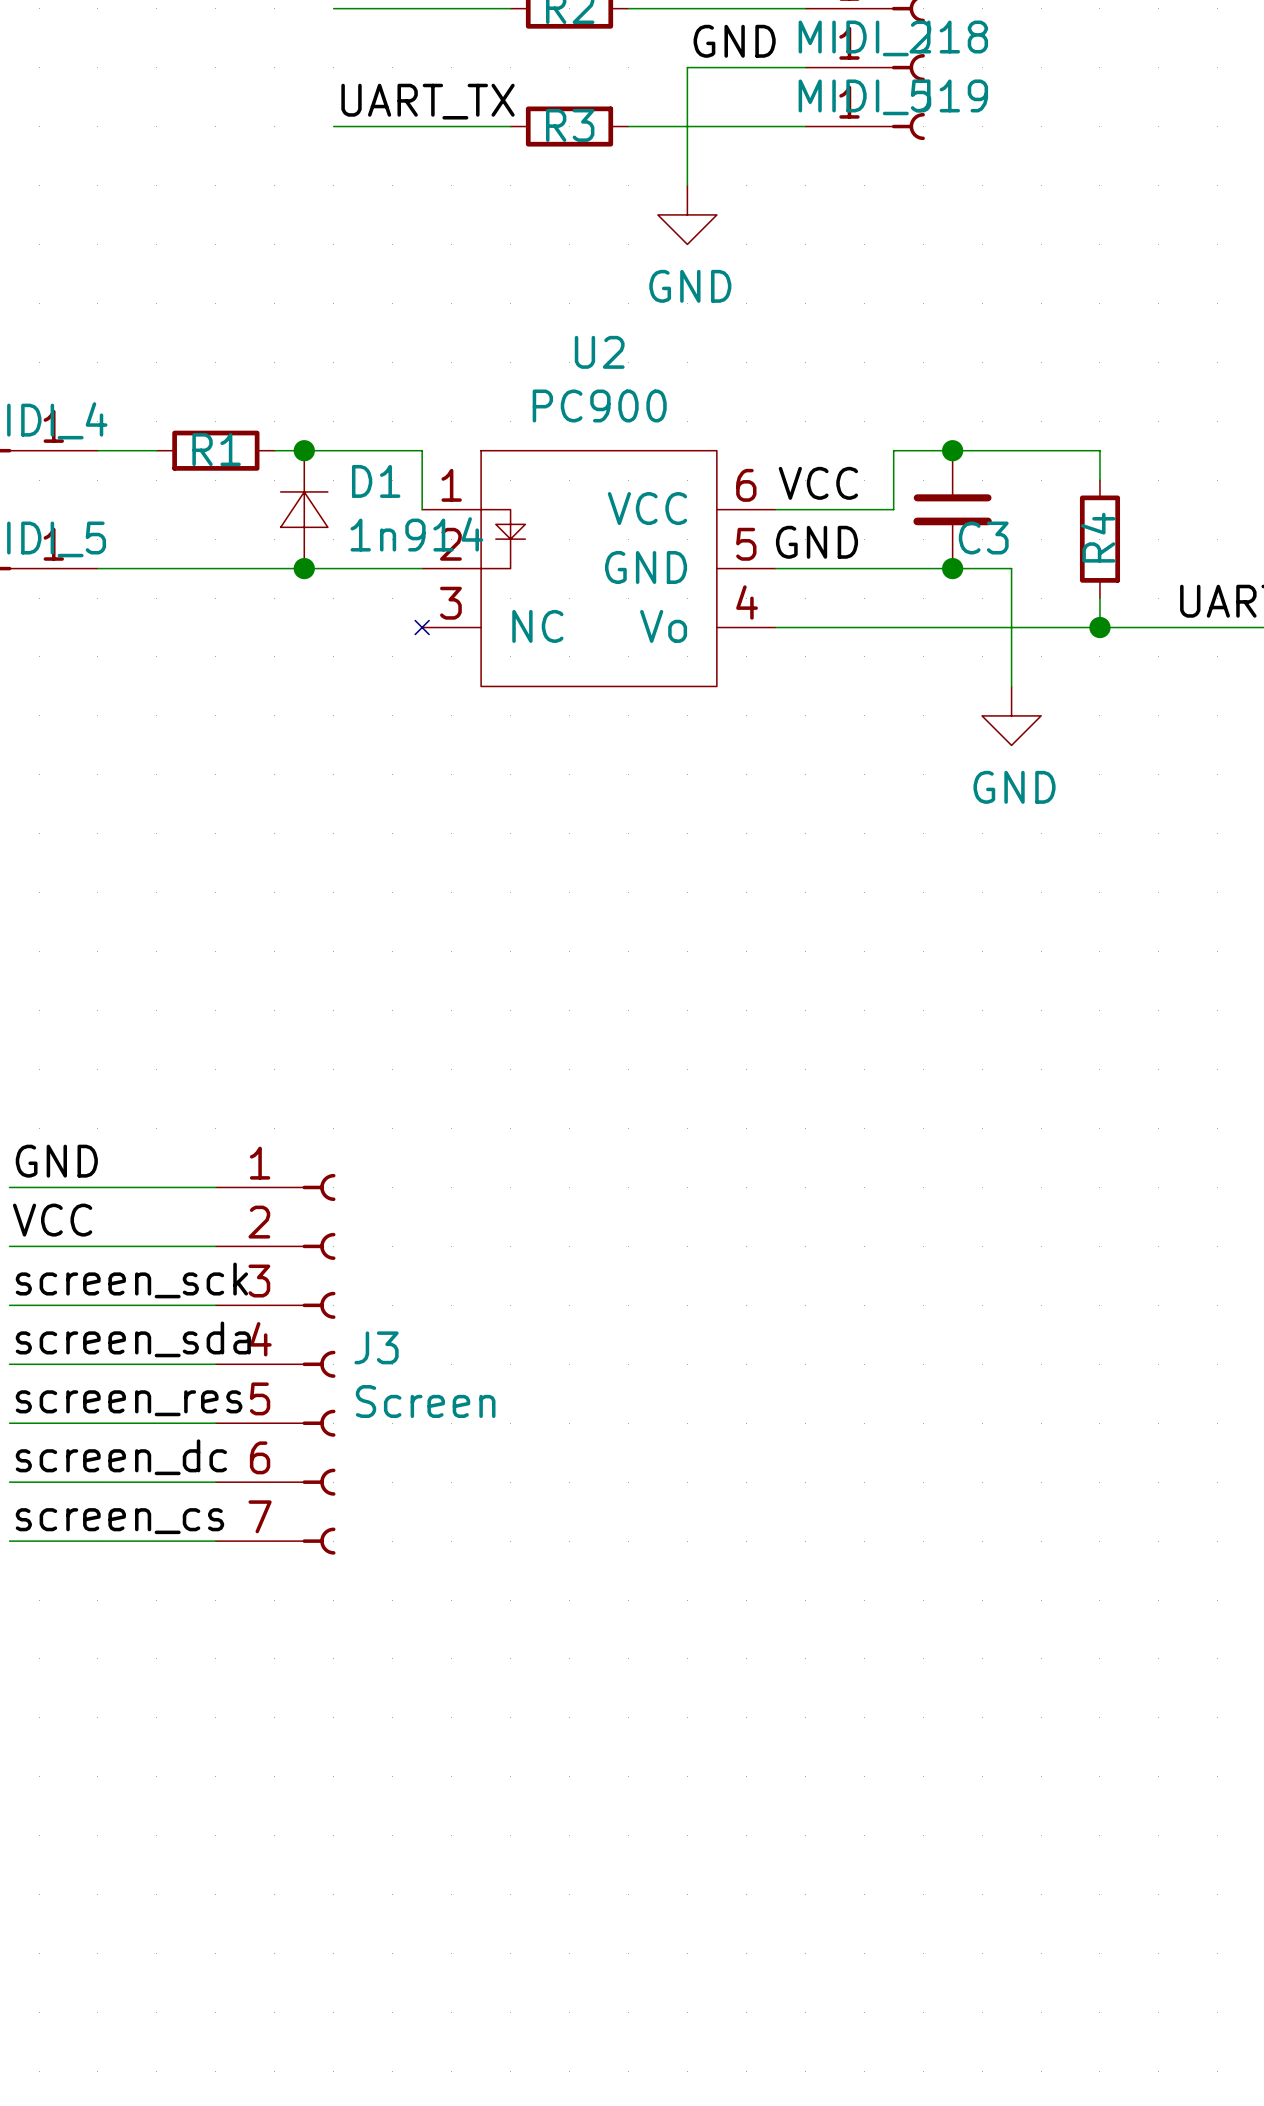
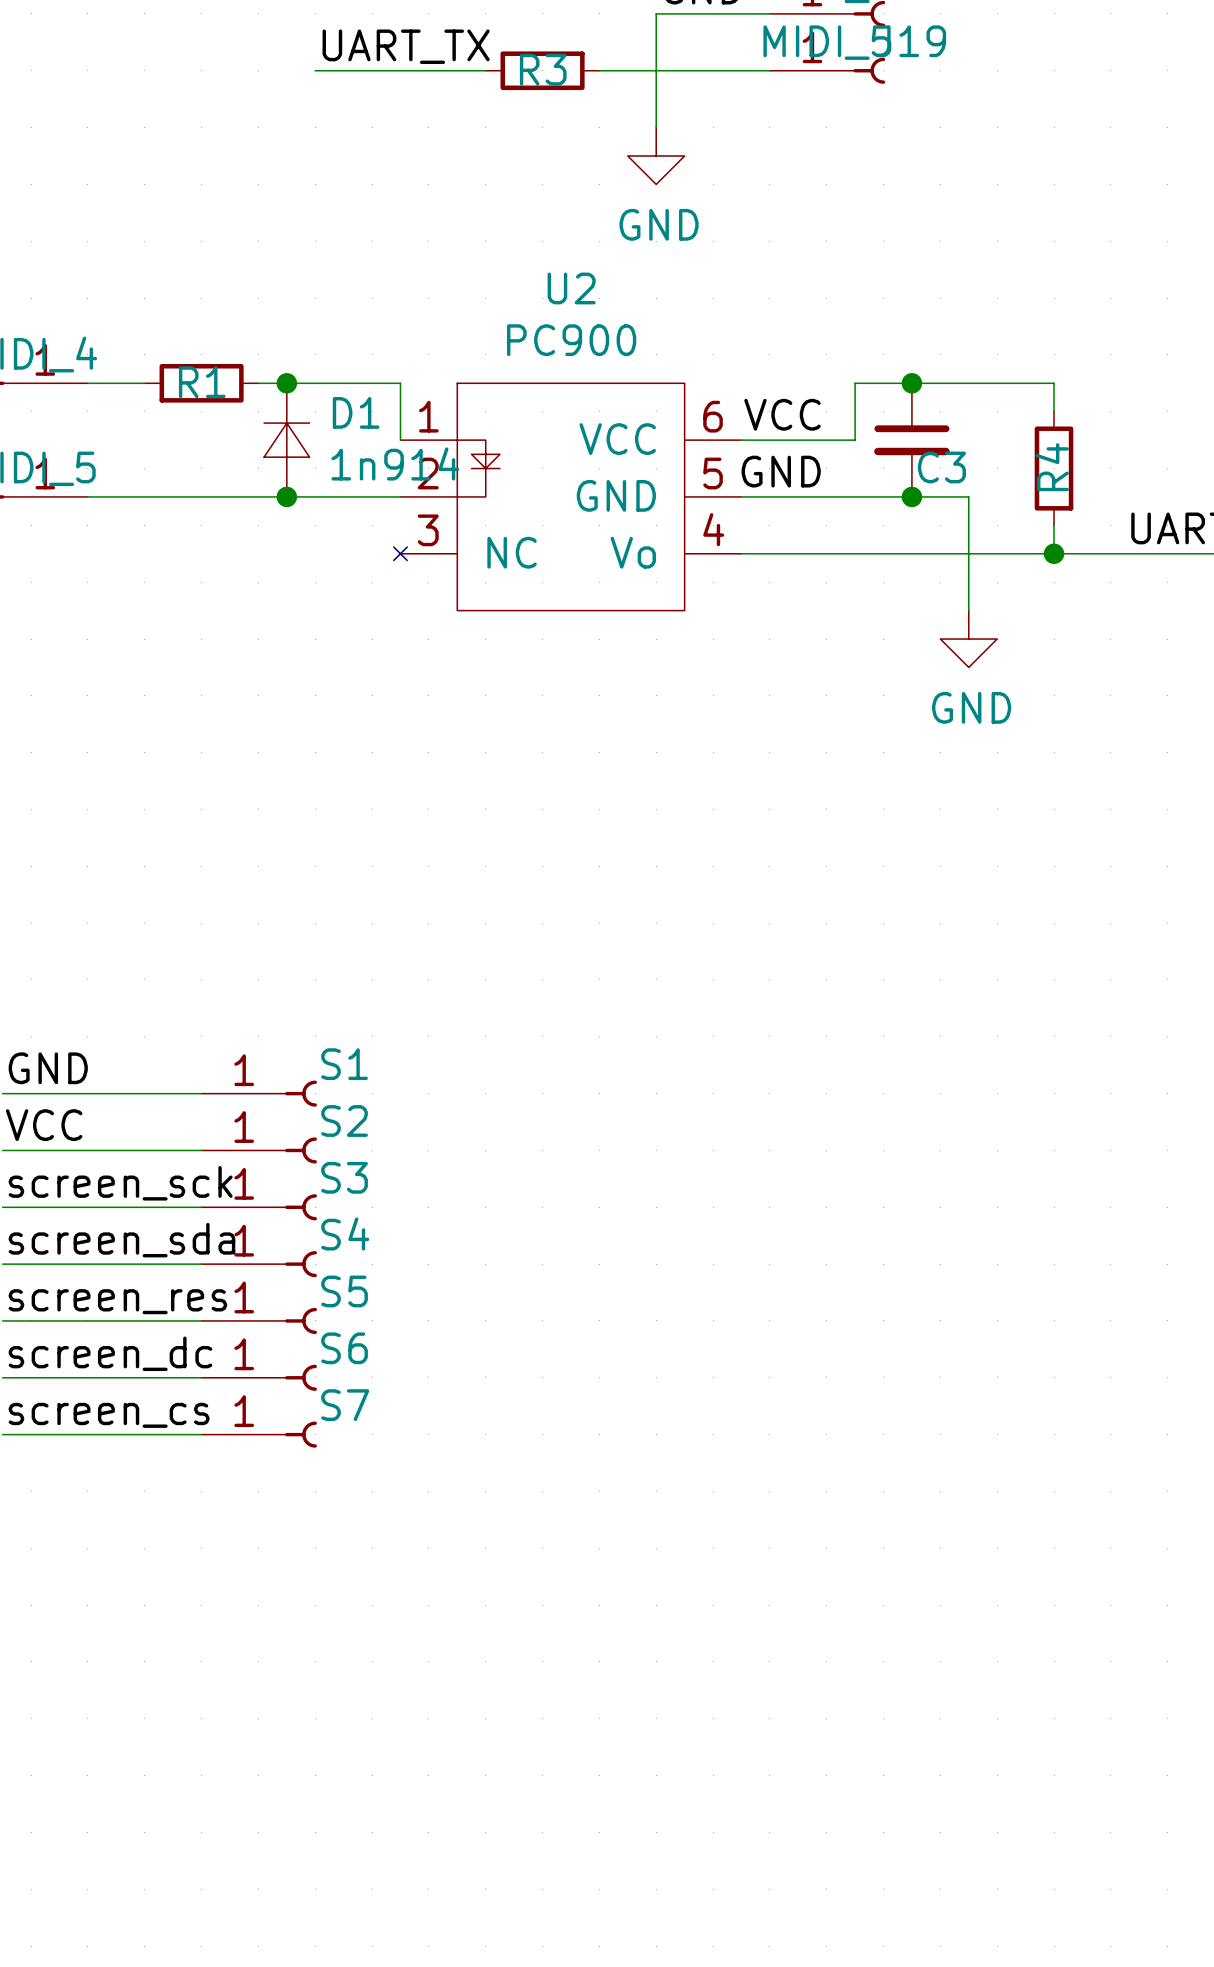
S1: none -> (259, 1093)
S2: none -> (259, 1150)
S3: none -> (259, 1207)
J3: Screen (275, 1364) -> none
S4: none -> (259, 1264)
S5: none -> (259, 1320)
S6: none -> (259, 1377)
S7: none -> (259, 1434)

